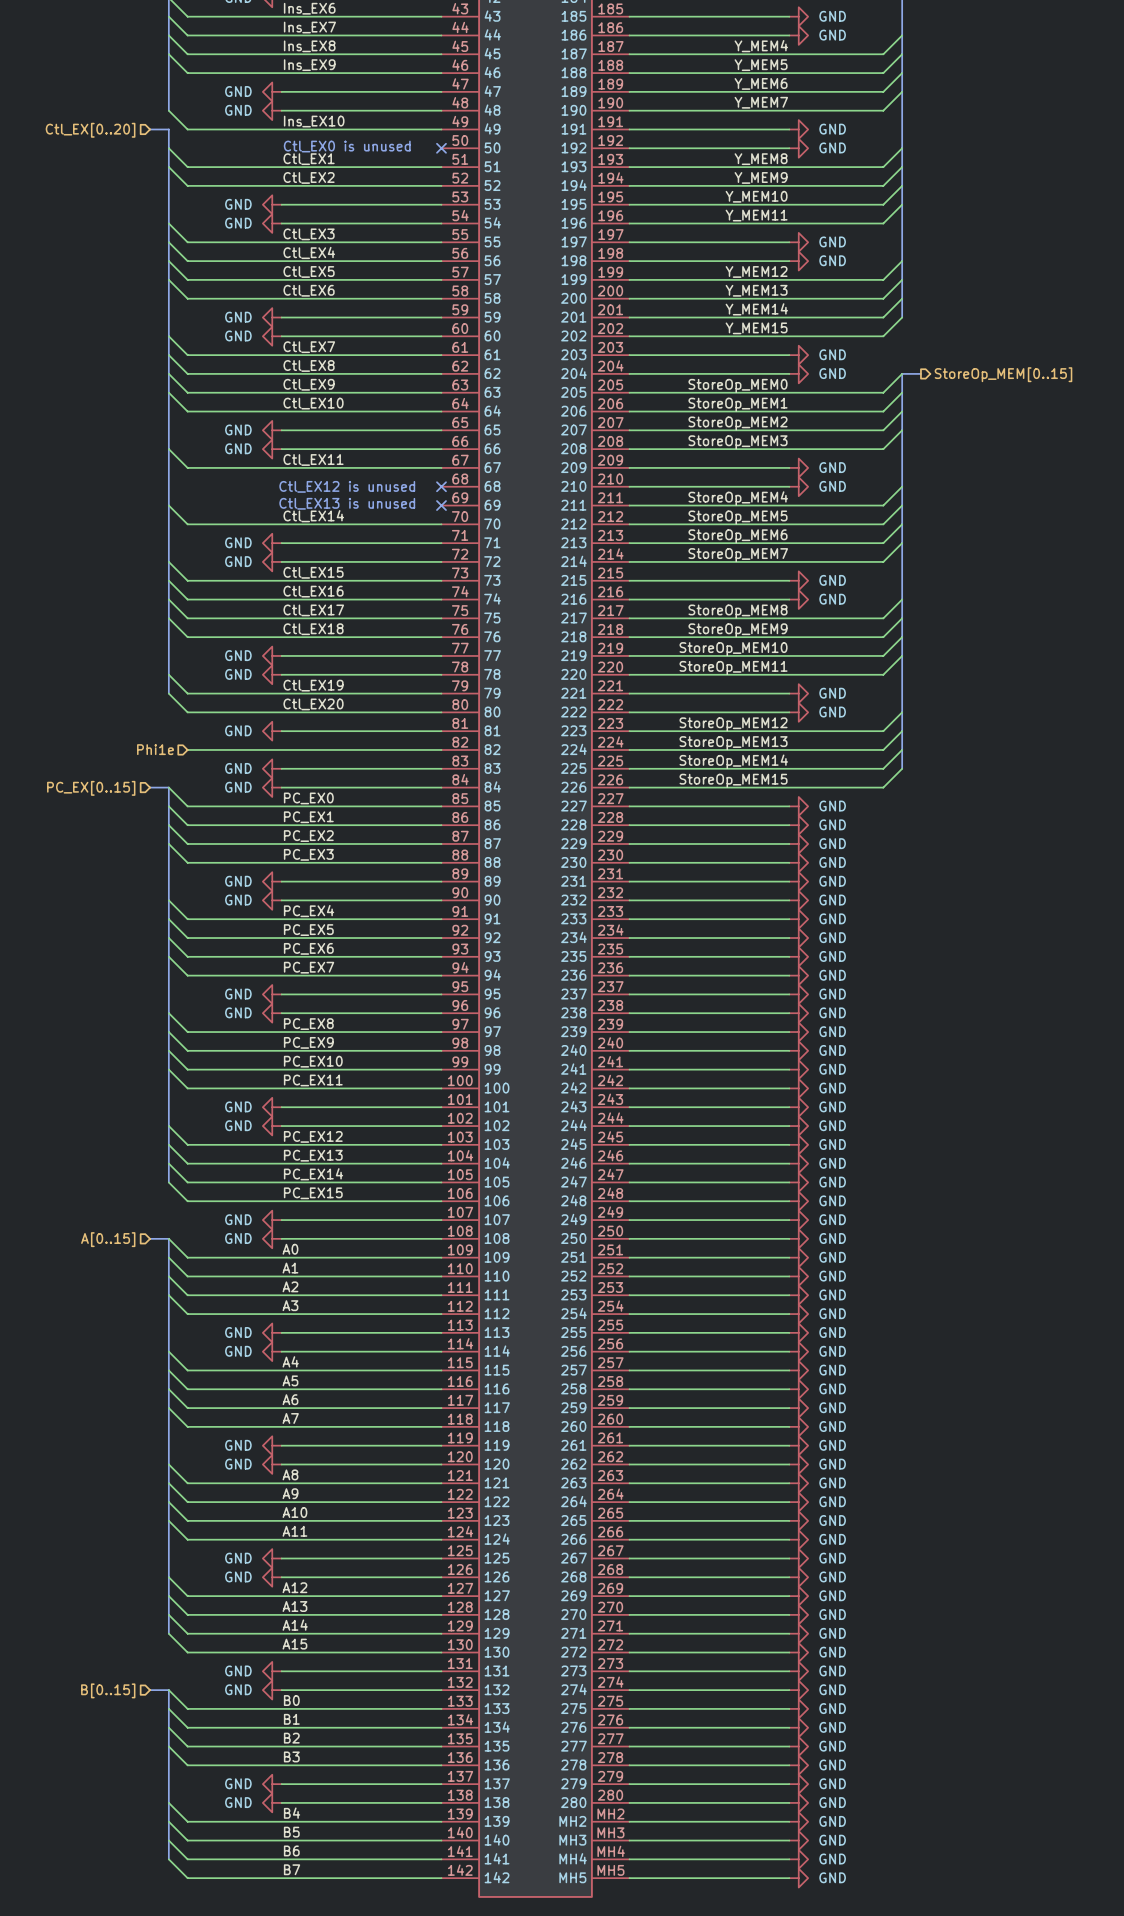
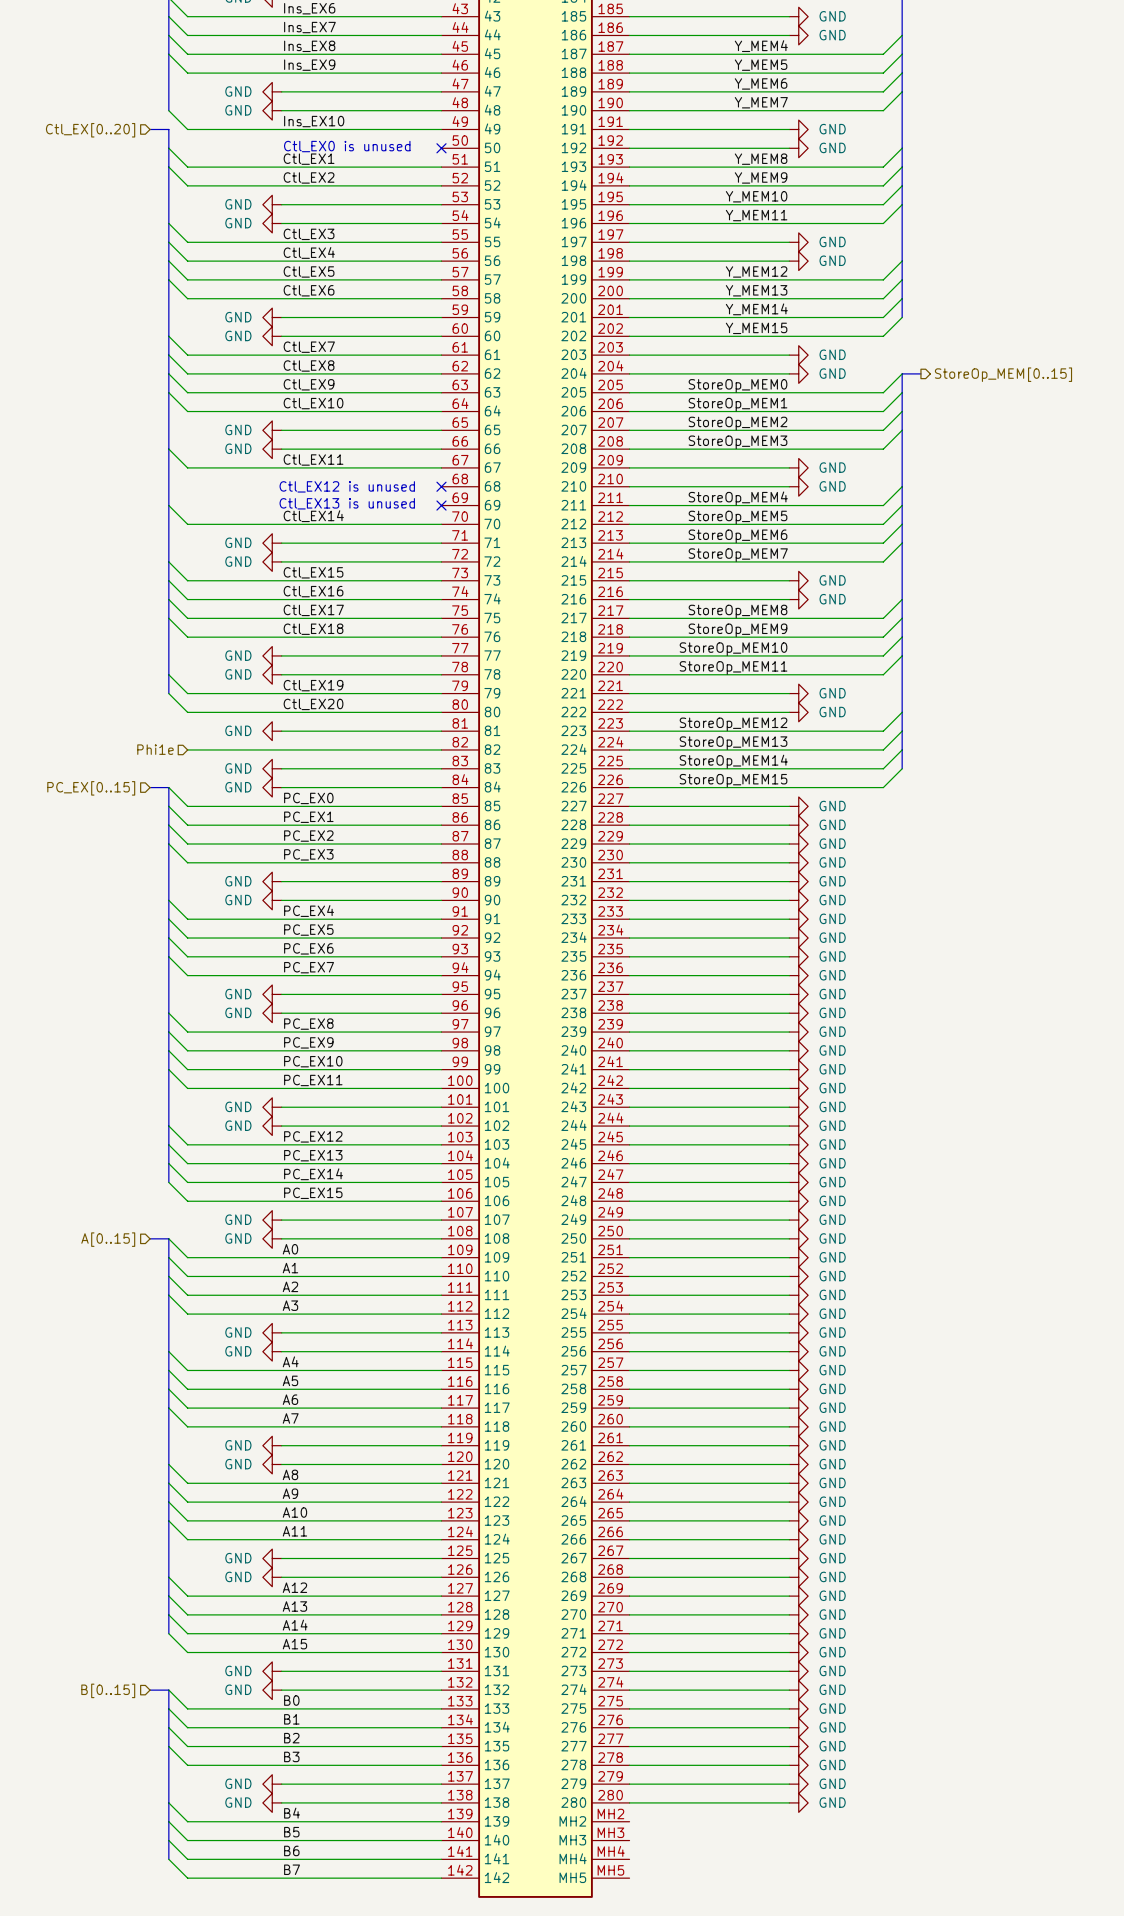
wire: (629, 1821) (789, 1821) -> none
power symbol: GND (798, 1821) -> none
wire: (629, 1840) (789, 1840) -> none
power symbol: GND (798, 1840) -> none
wire: (629, 1859) (789, 1859) -> none
power symbol: GND (798, 1859) -> none
wire: (629, 1878) (789, 1878) -> none
power symbol: GND (798, 1878) -> none

